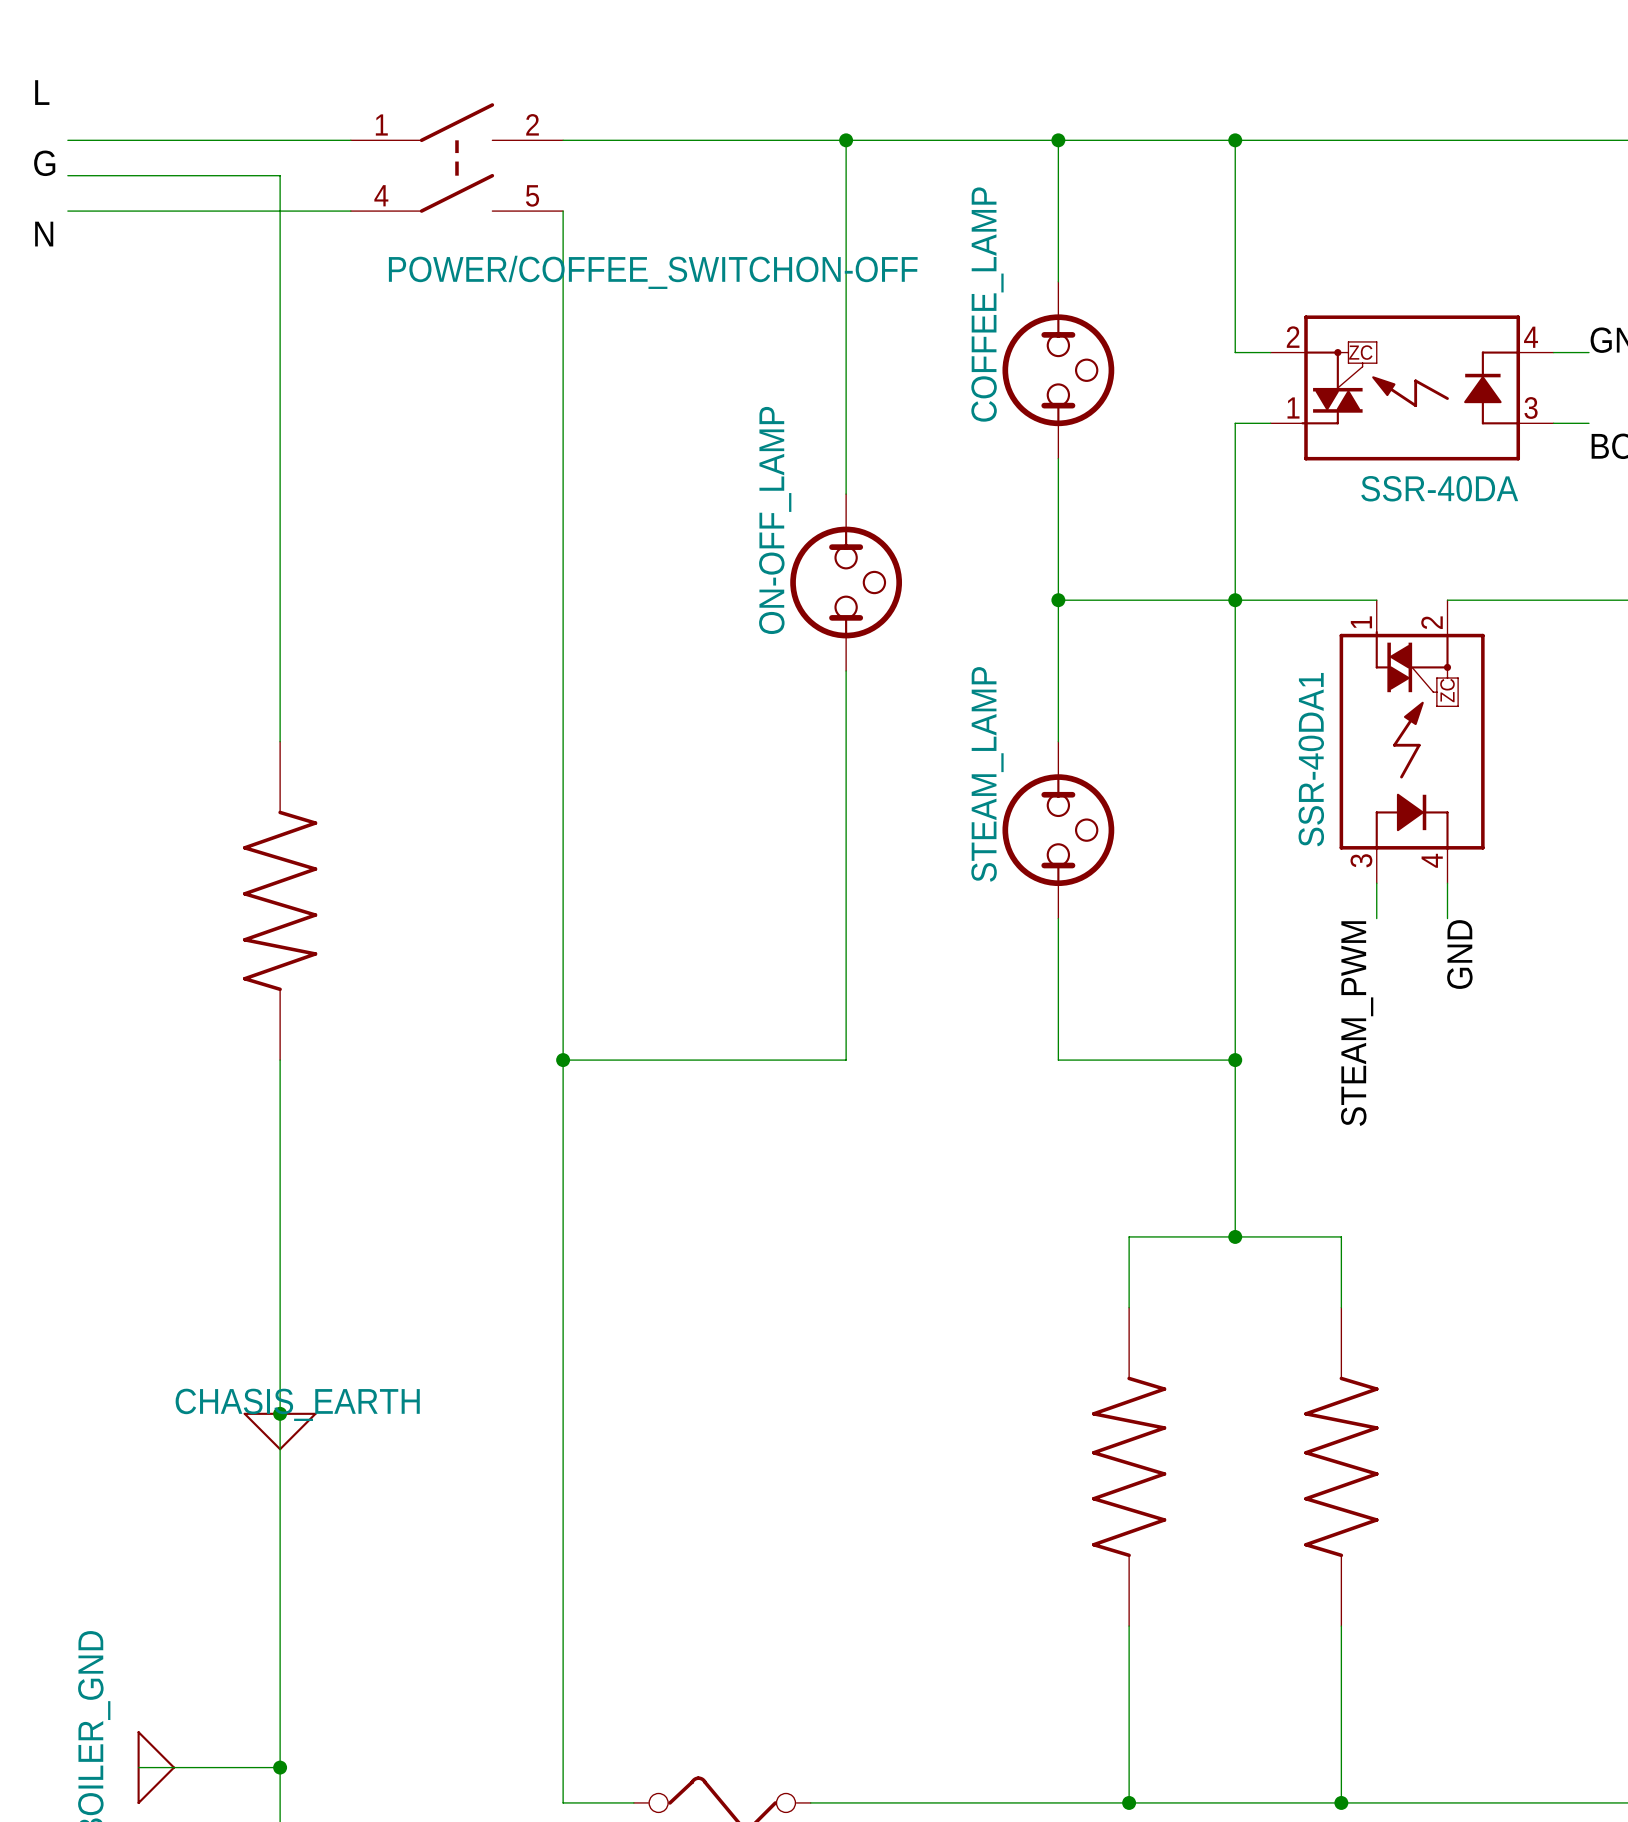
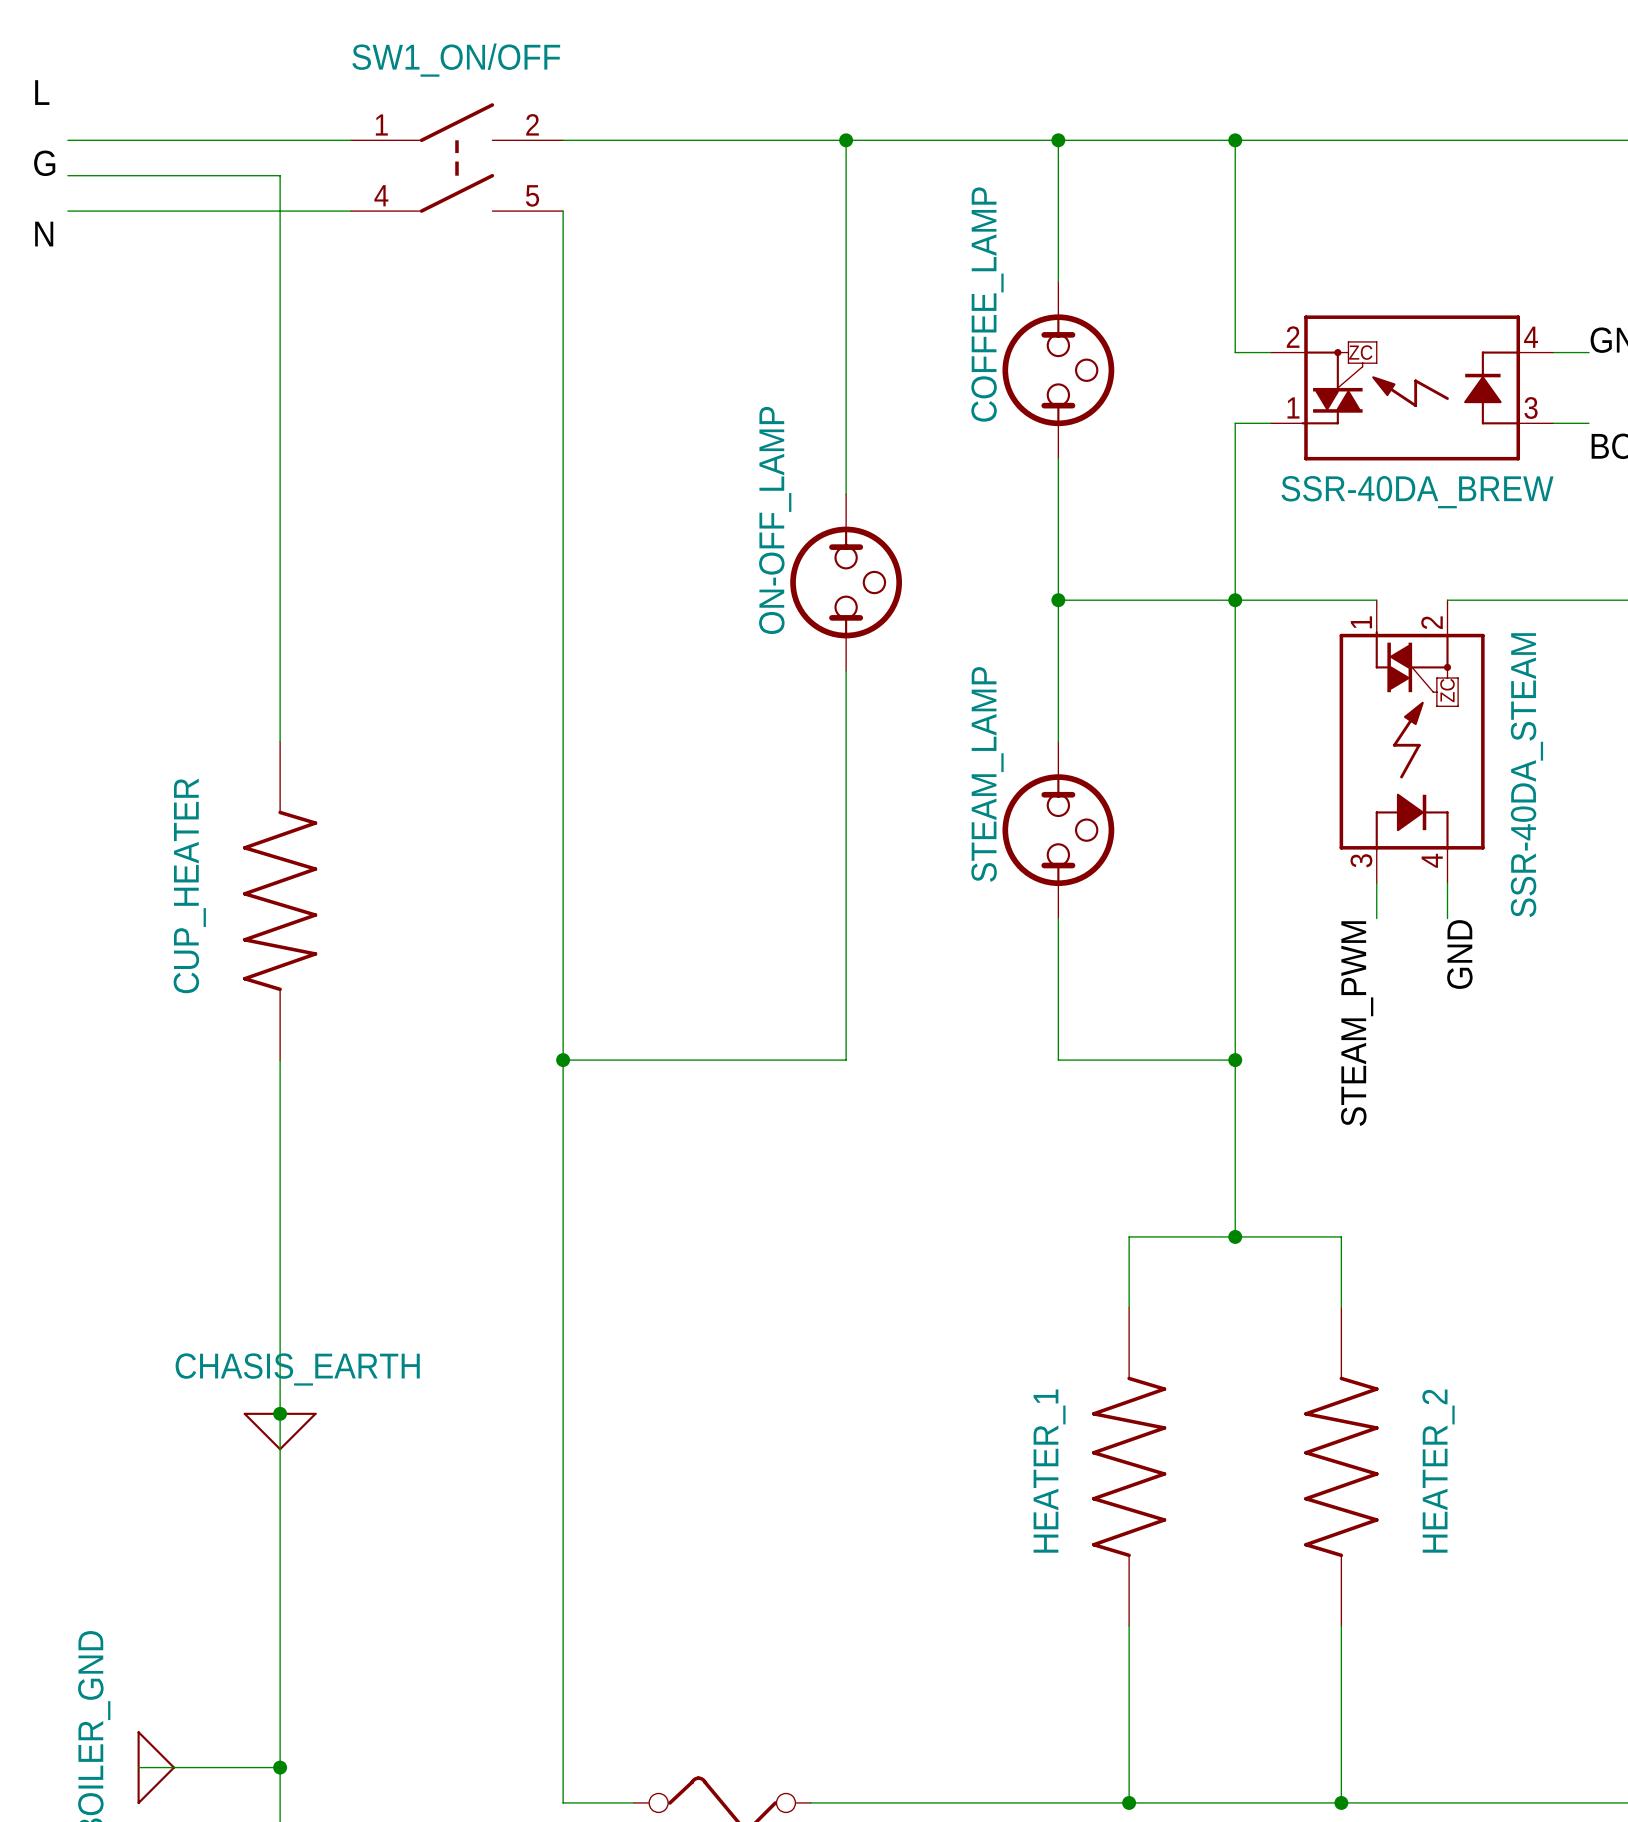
SW1_ON/OFF name: none -> SW1_ON/OFF (456, 60)
SW1_ON/OFF value: POWER/COFFEE_SWITCHON-OFF (653, 272) -> none
SSR-40DA name: SSR-40DA (1439, 488) -> SSR-40DA_BREW (1417, 492)
SSR-40DA1 name: SSR-40DA1 (1311, 759) -> SSR-40DA_STEAM (1526, 775)
CUP_HEATER name: none -> CUP_HEATER (189, 885)
power symbol text position: CHASIS_EARTH (297, 1404) -> CHASIS_EARTH (297, 1369)
HEATER_1 name: none -> HEATER_1 (1049, 1471)
HEATER_2 name: none -> HEATER_2 (1438, 1471)

